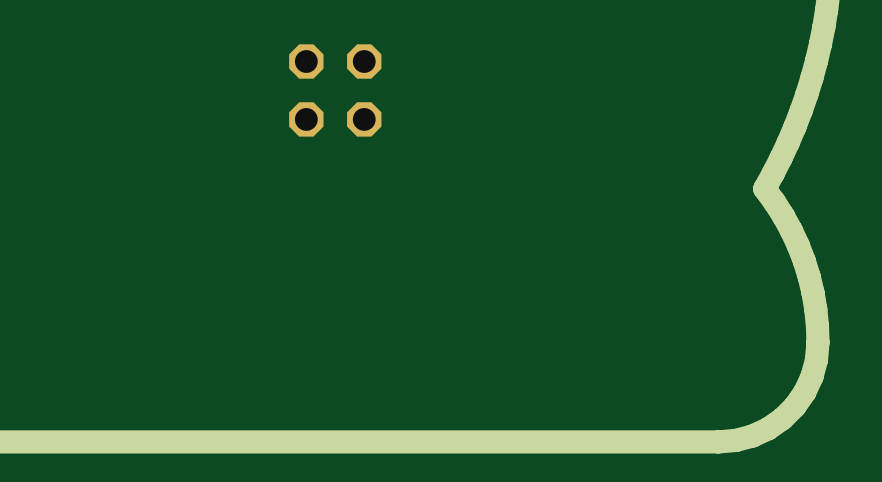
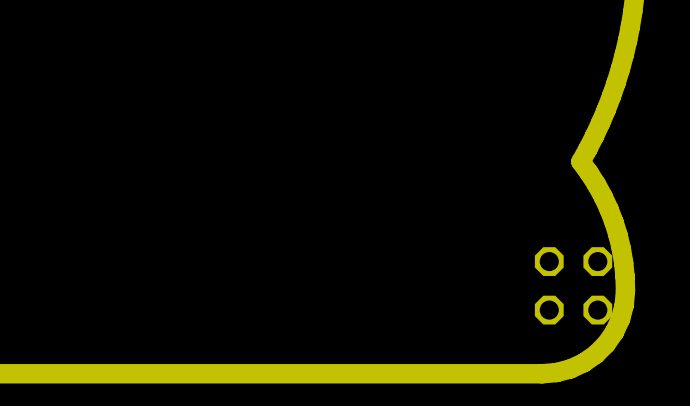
part position: (335, 90) -> (573, 285)

